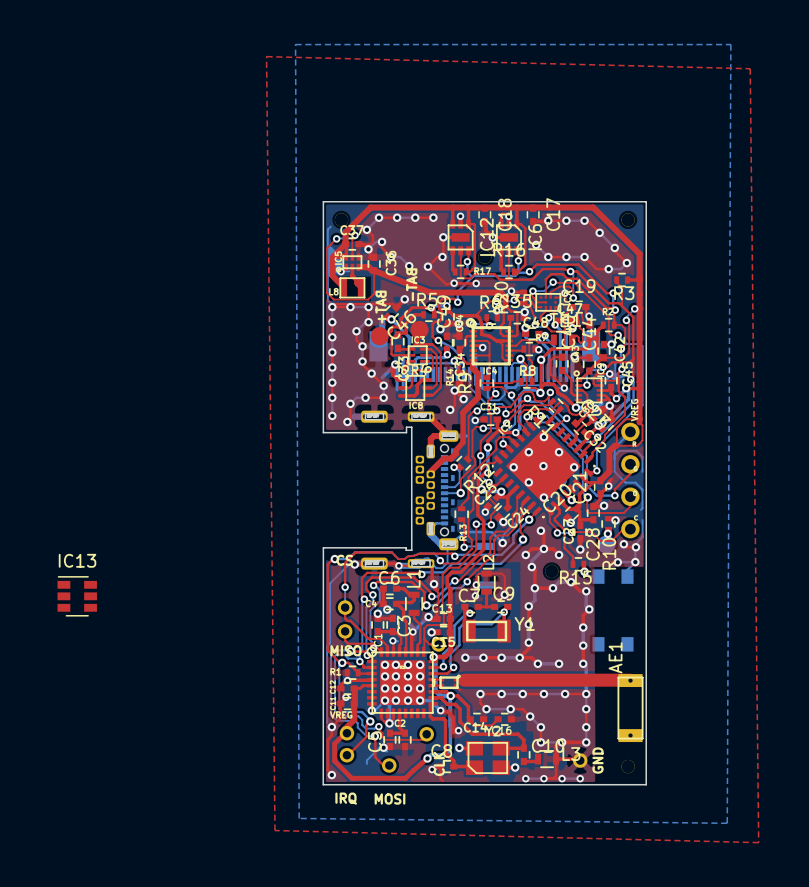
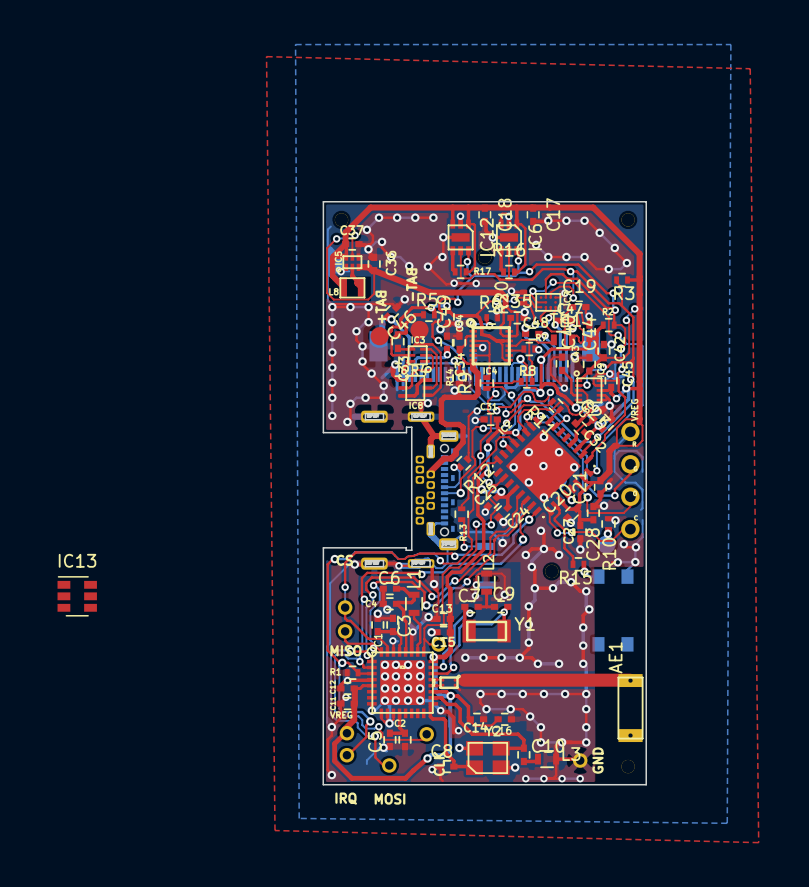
top track: (454, 390) (454, 405) (450, 409) -> none
top track: (477, 394) (477, 397) (463, 412) (463, 427) -> (477, 394) (474, 397) (444, 397) (441, 400) (441, 421) (446, 424) (458, 424) (463, 427)
via: (463, 399) -> none
top track: none -> (427, 403) (421, 403) (421, 416) (433, 436)
via: none -> (427, 403)
via: (450, 409) -> none
top track: (429, 416) (448, 436) -> none

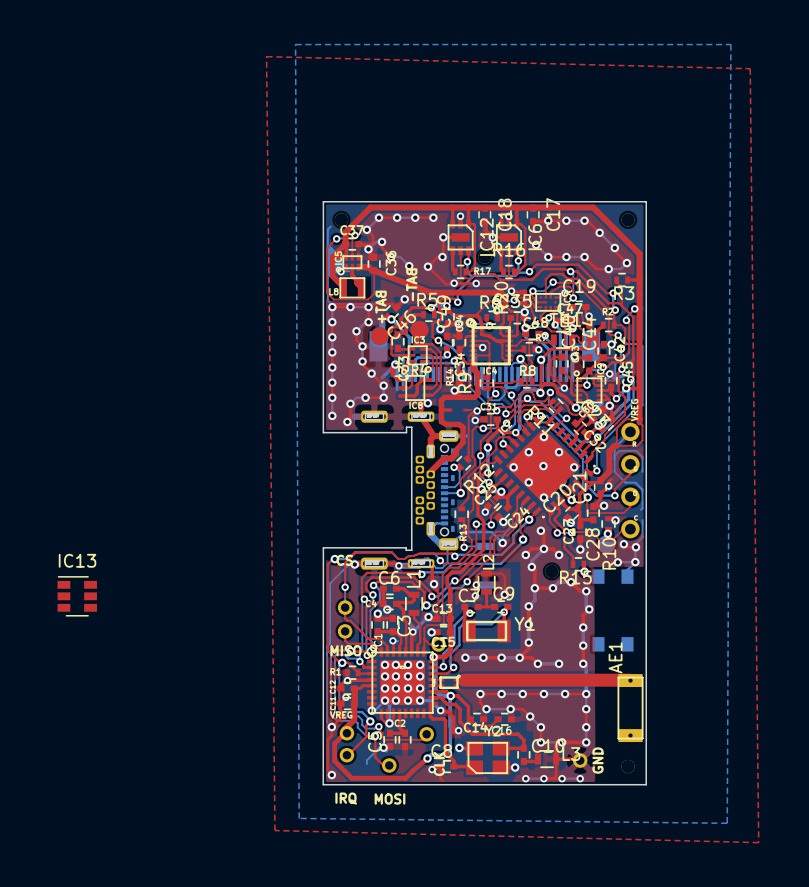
top track: none -> (441, 409) (450, 409)
top track: none -> (465, 409) (471, 409)
top track: none -> (483, 409) (478, 409) (472, 416)

